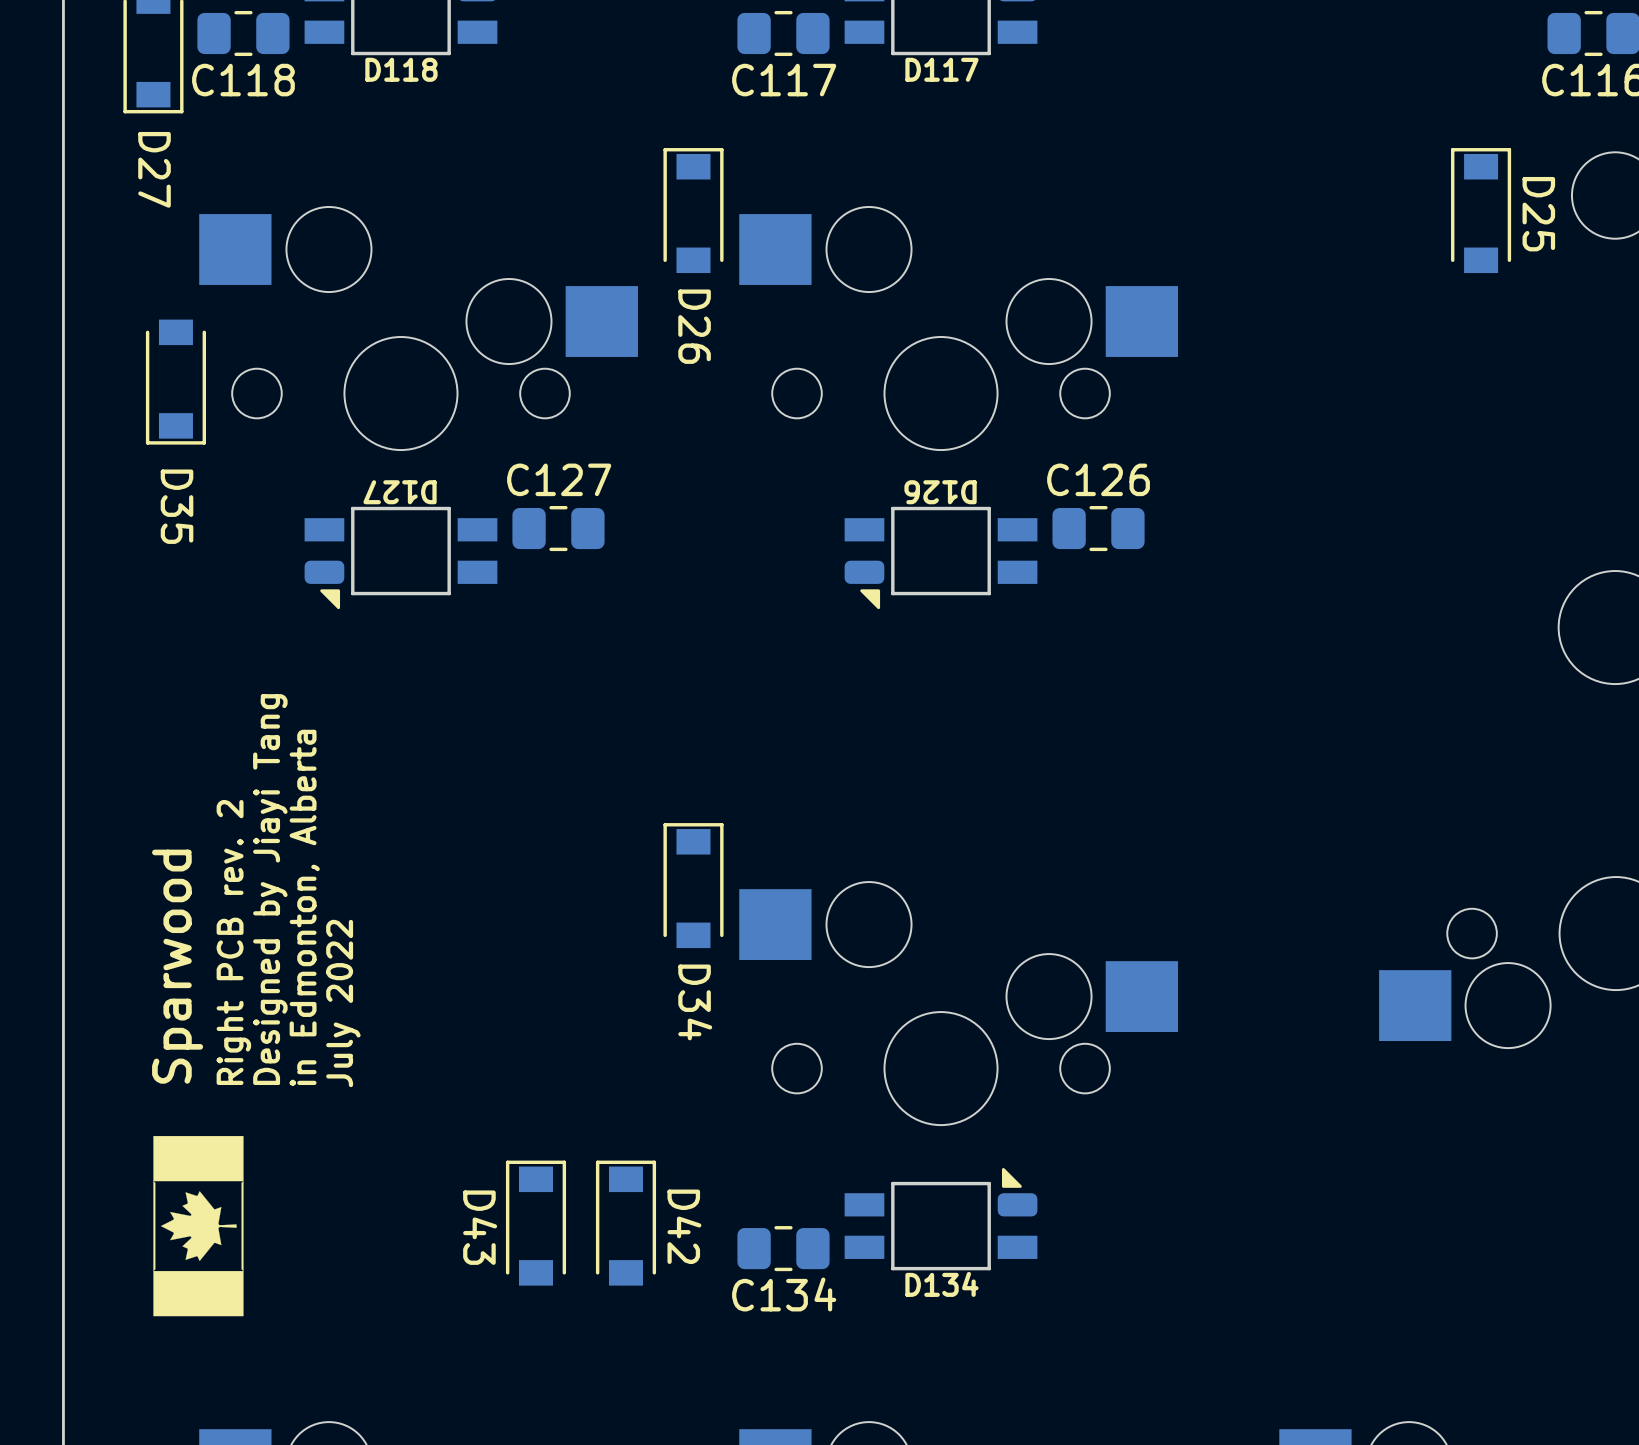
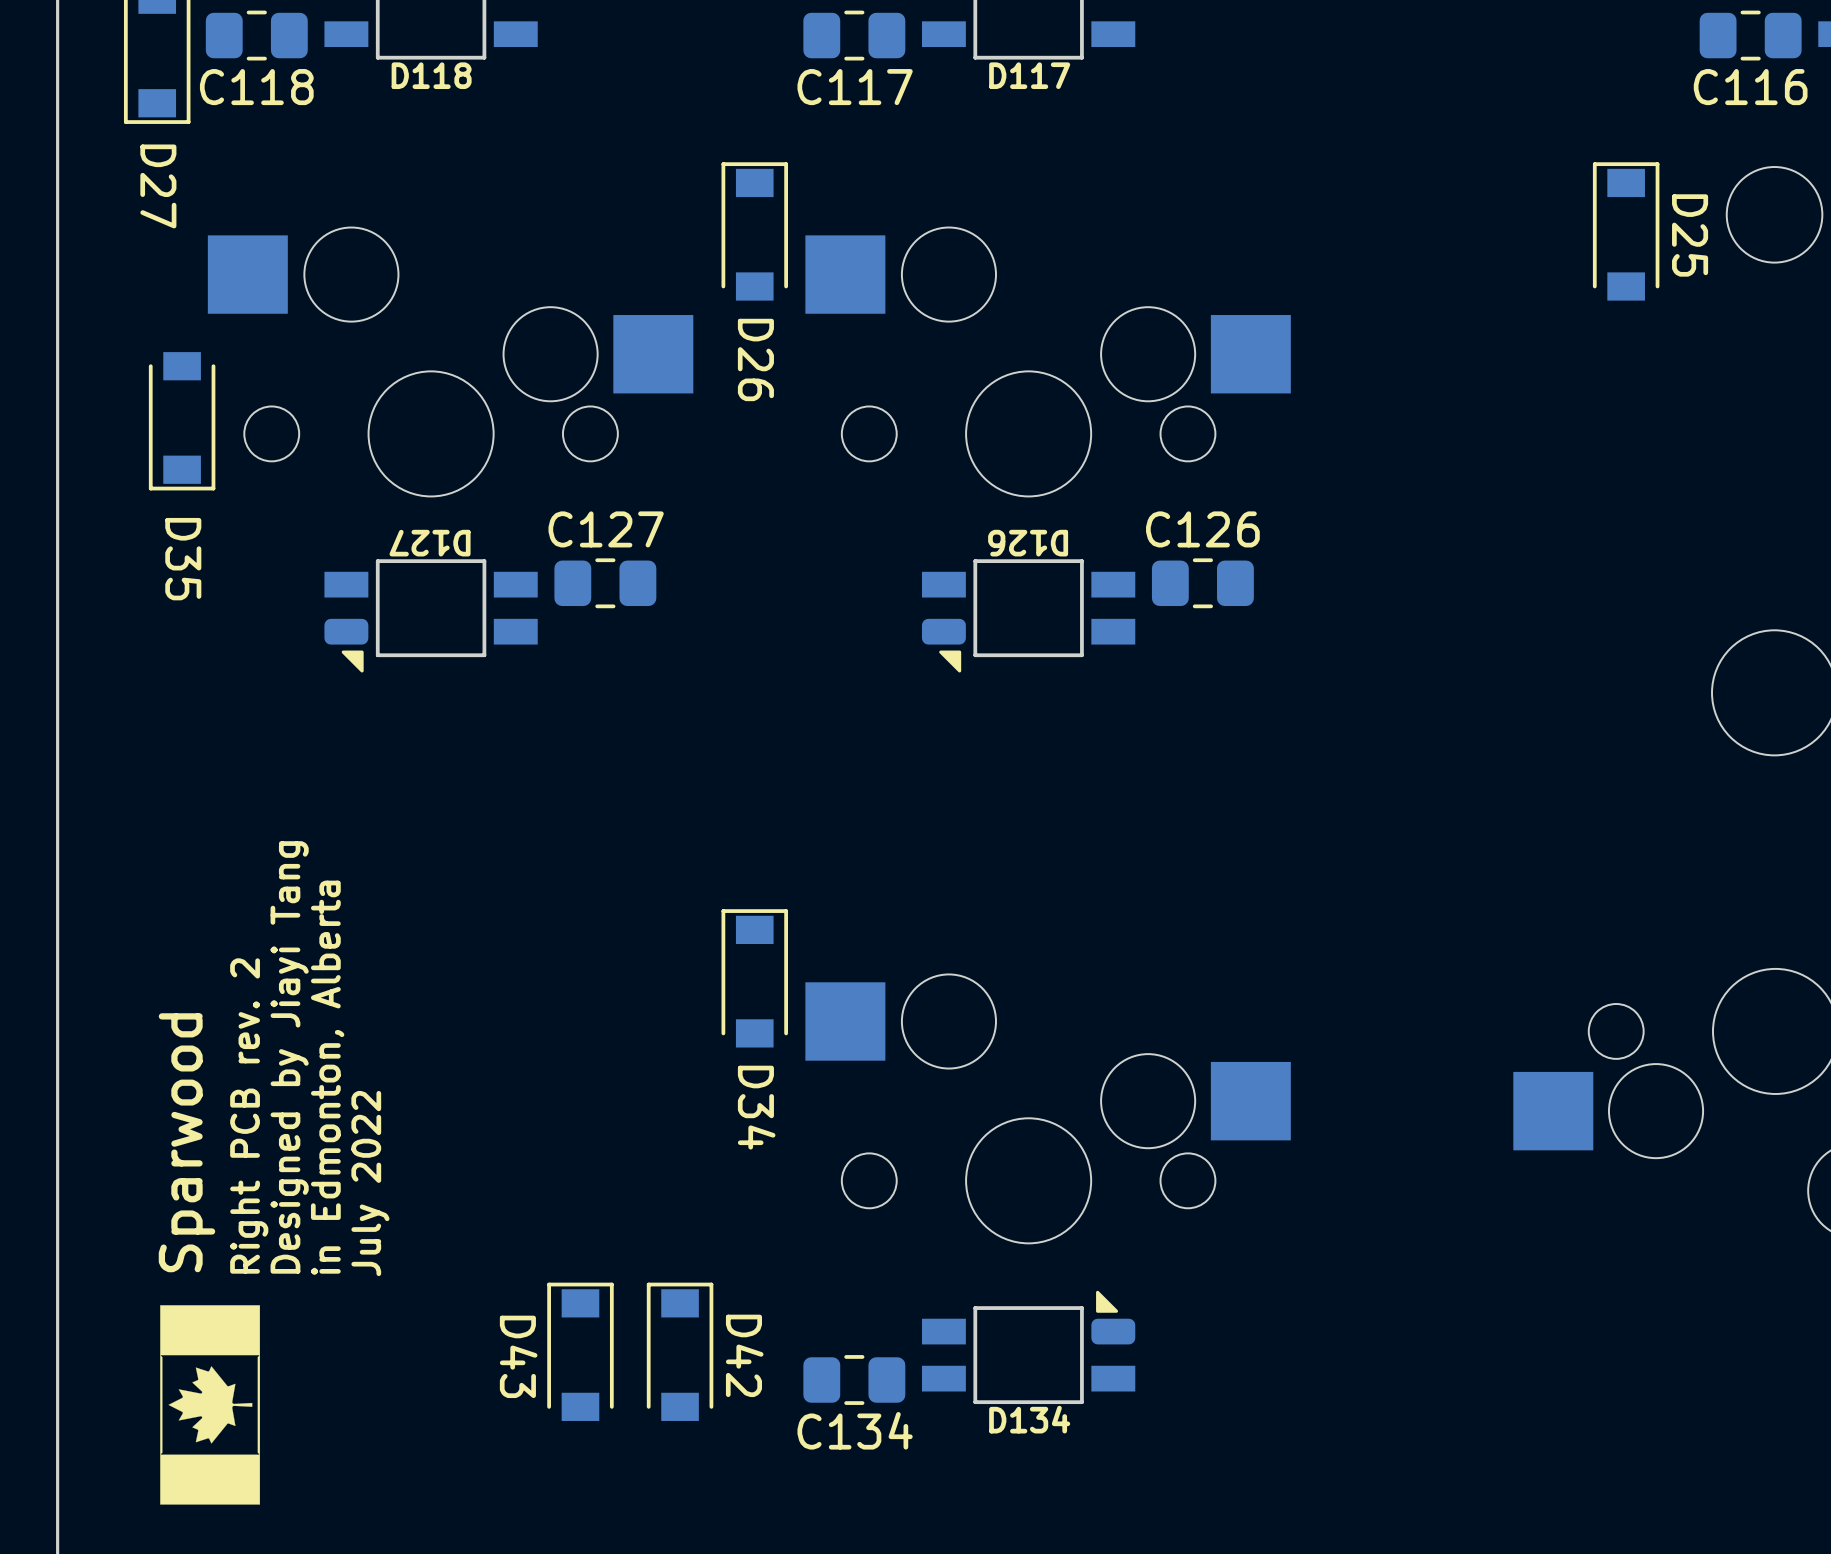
text position: Designed by Jiayi Tang (270, 889) -> Designed by Jiayi Tang (289, 1057)
text position: in Edmonton, Alberta (304, 907) -> in Edmonton, Alberta (327, 1077)
text position: Right PCB rev. 2 (233, 942) -> Right PCB rev. 2 (249, 1116)
text position: Sparwood (177, 966) -> Sparwood (186, 1142)
text position: July 2022 (343, 1003) -> July 2022 (370, 1183)
drawing: [153, 1135, 244, 1182] -> none
drawing: none -> [160, 1305, 260, 1356]
drawing position: (154, 1226) -> (161, 1404)
drawing position: (198, 1226) -> (210, 1404)
drawing position: (242, 1226) -> (258, 1404)
drawing: [153, 1271, 244, 1317] -> none
drawing: none -> [160, 1454, 260, 1505]

